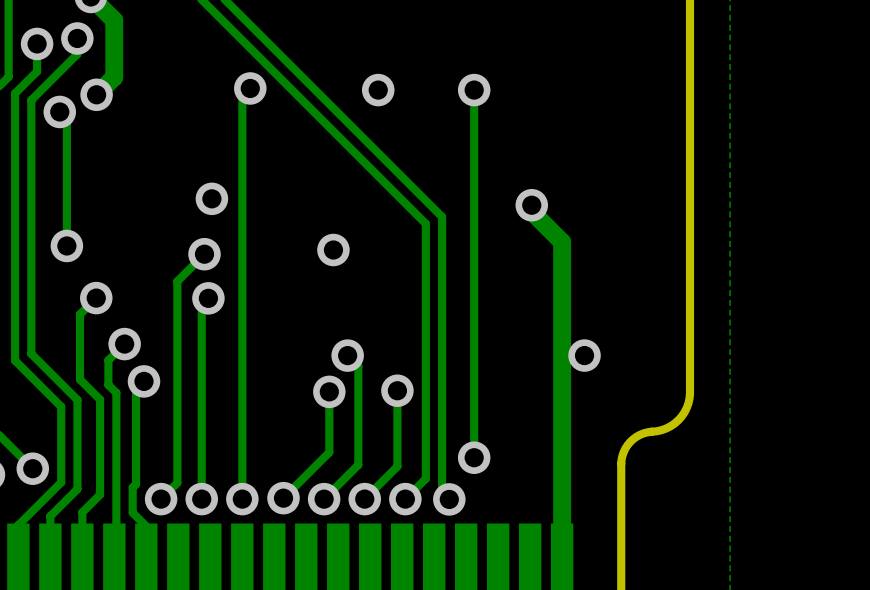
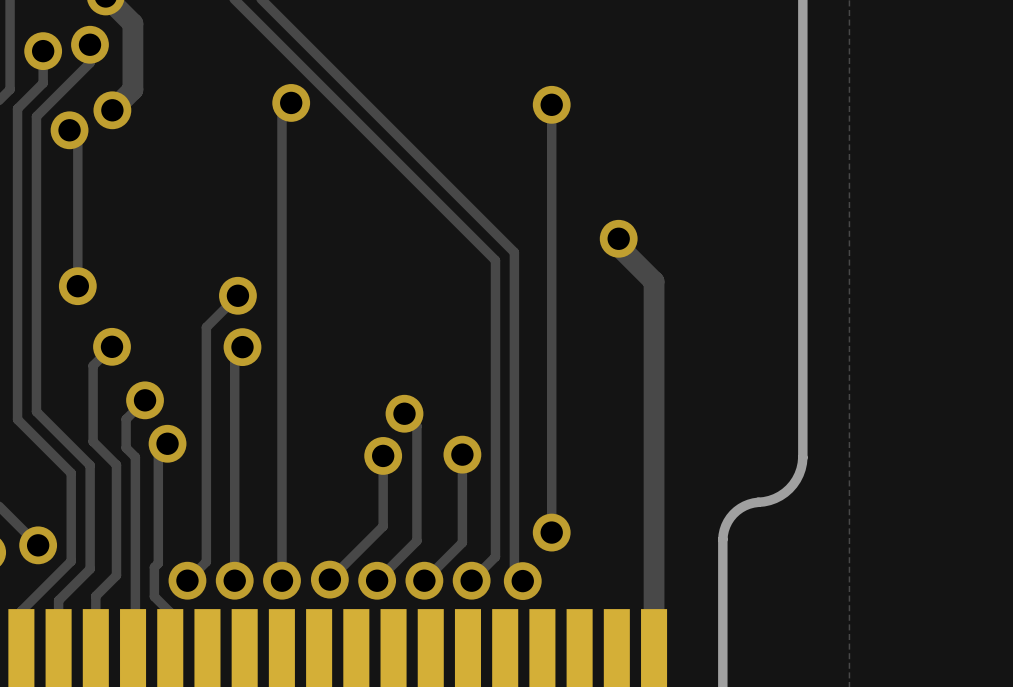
via: (378, 90) -> none
via: (211, 198) -> none
via: (333, 250) -> none
via: (584, 355) -> none

